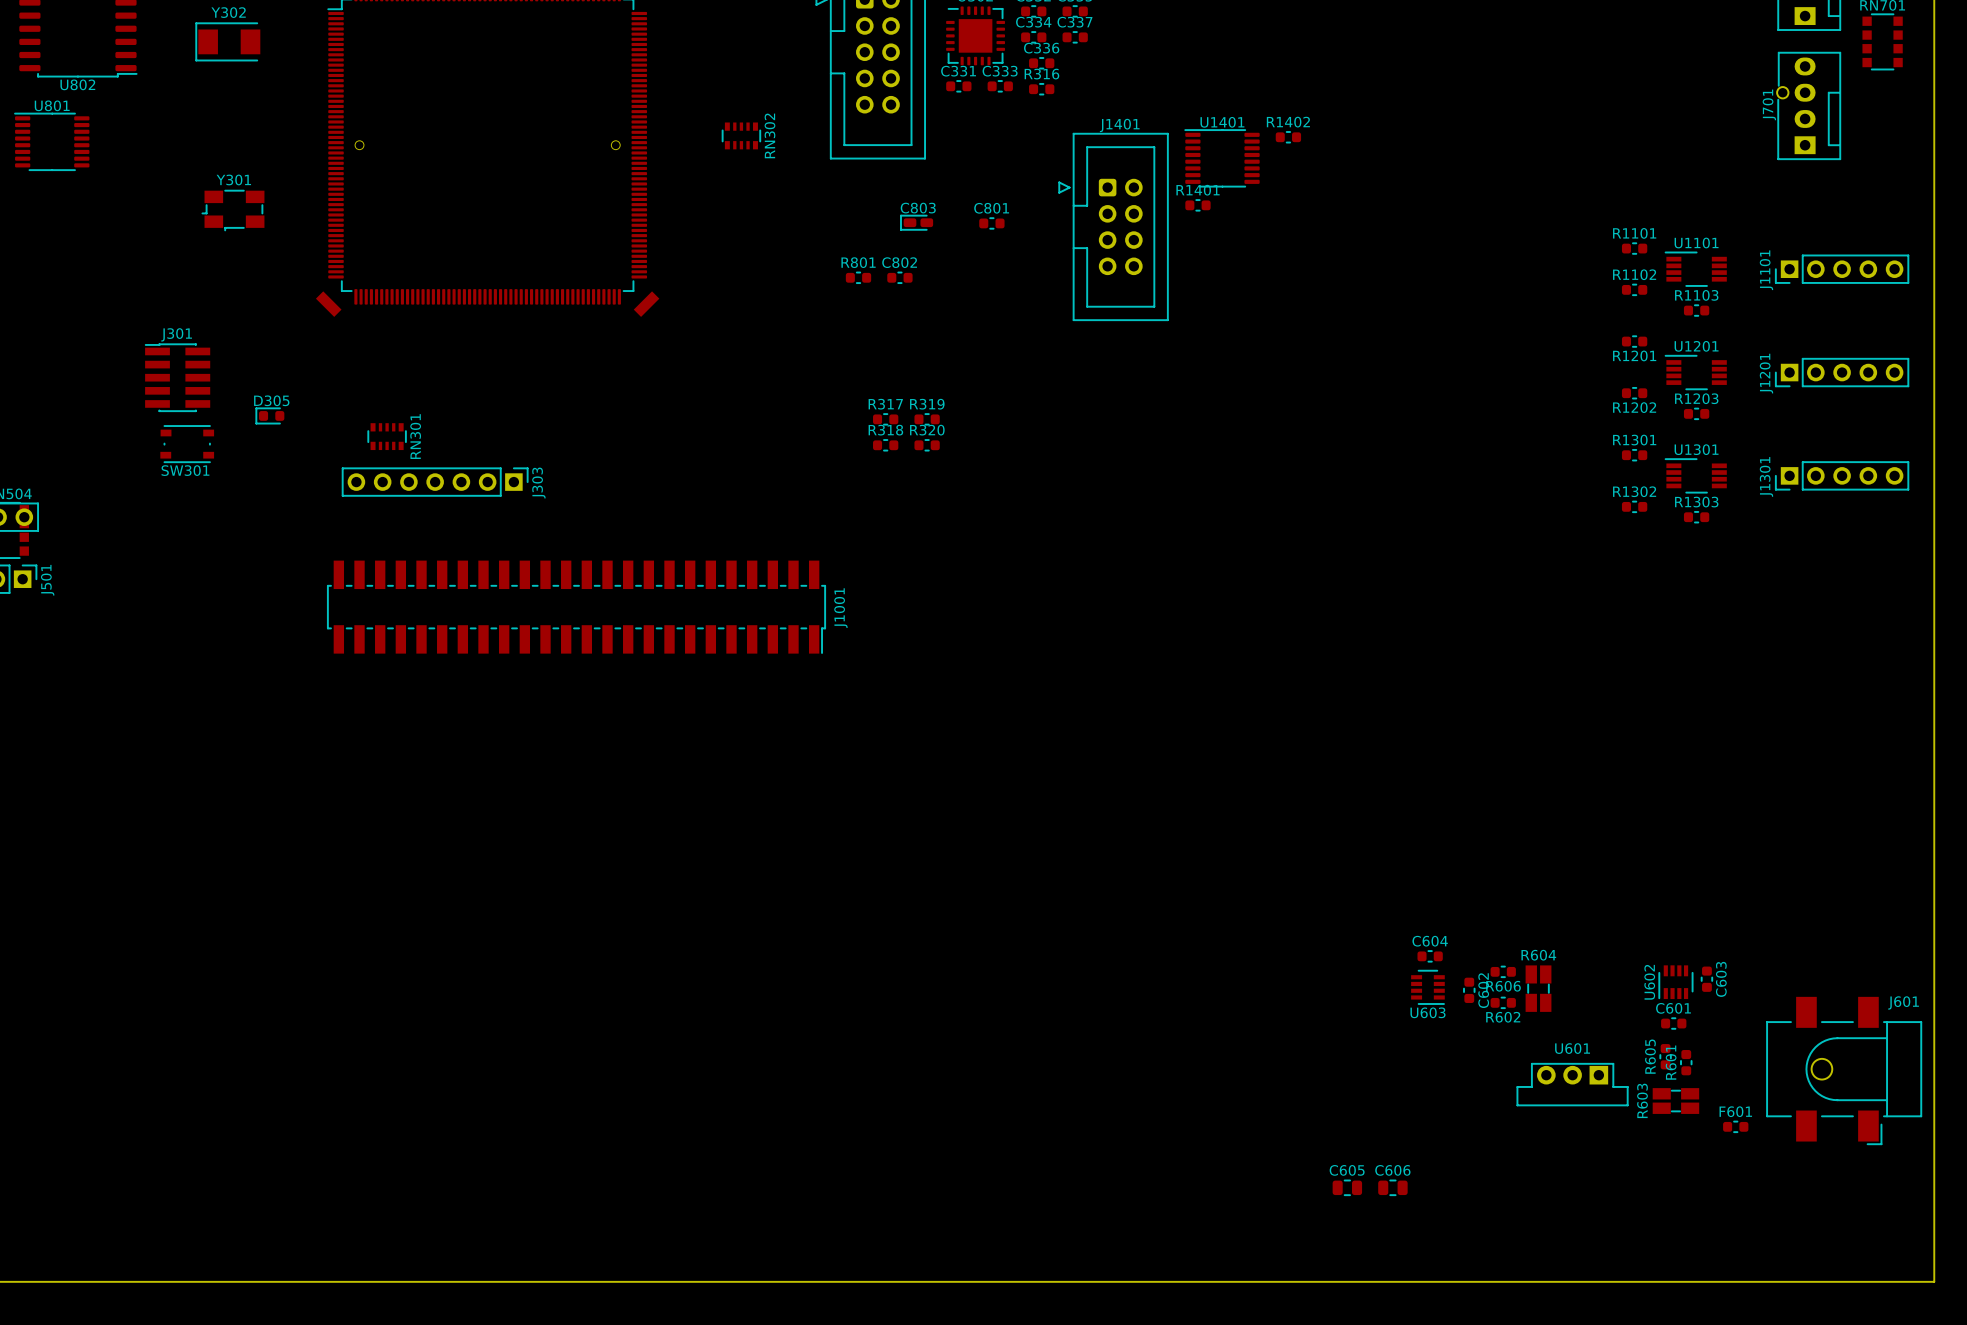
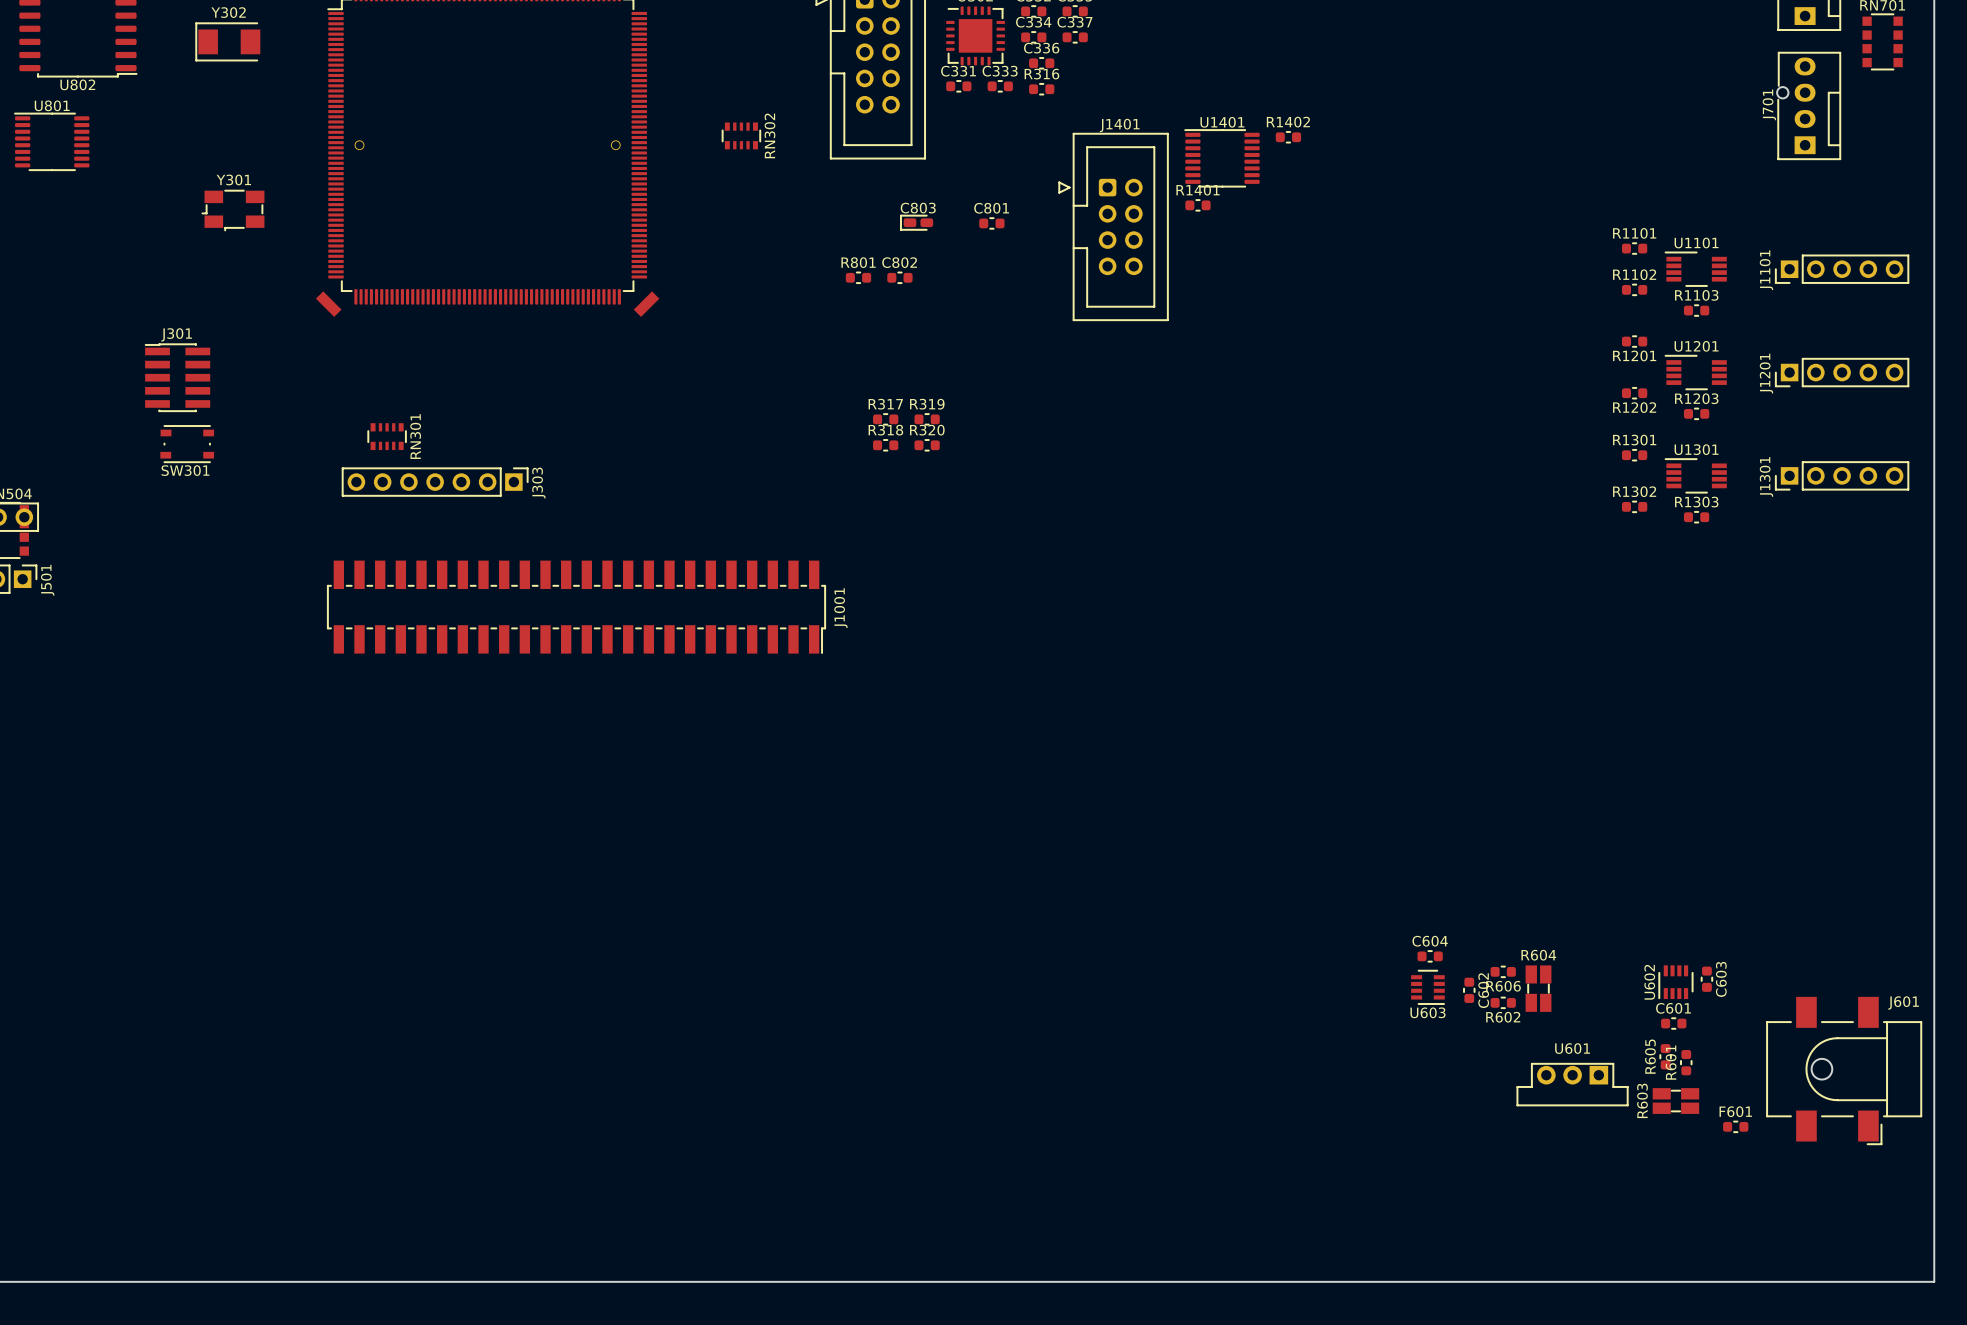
D305: (270, 415) -> none
C605: (1347, 1187) -> none
C606: (1392, 1187) -> none

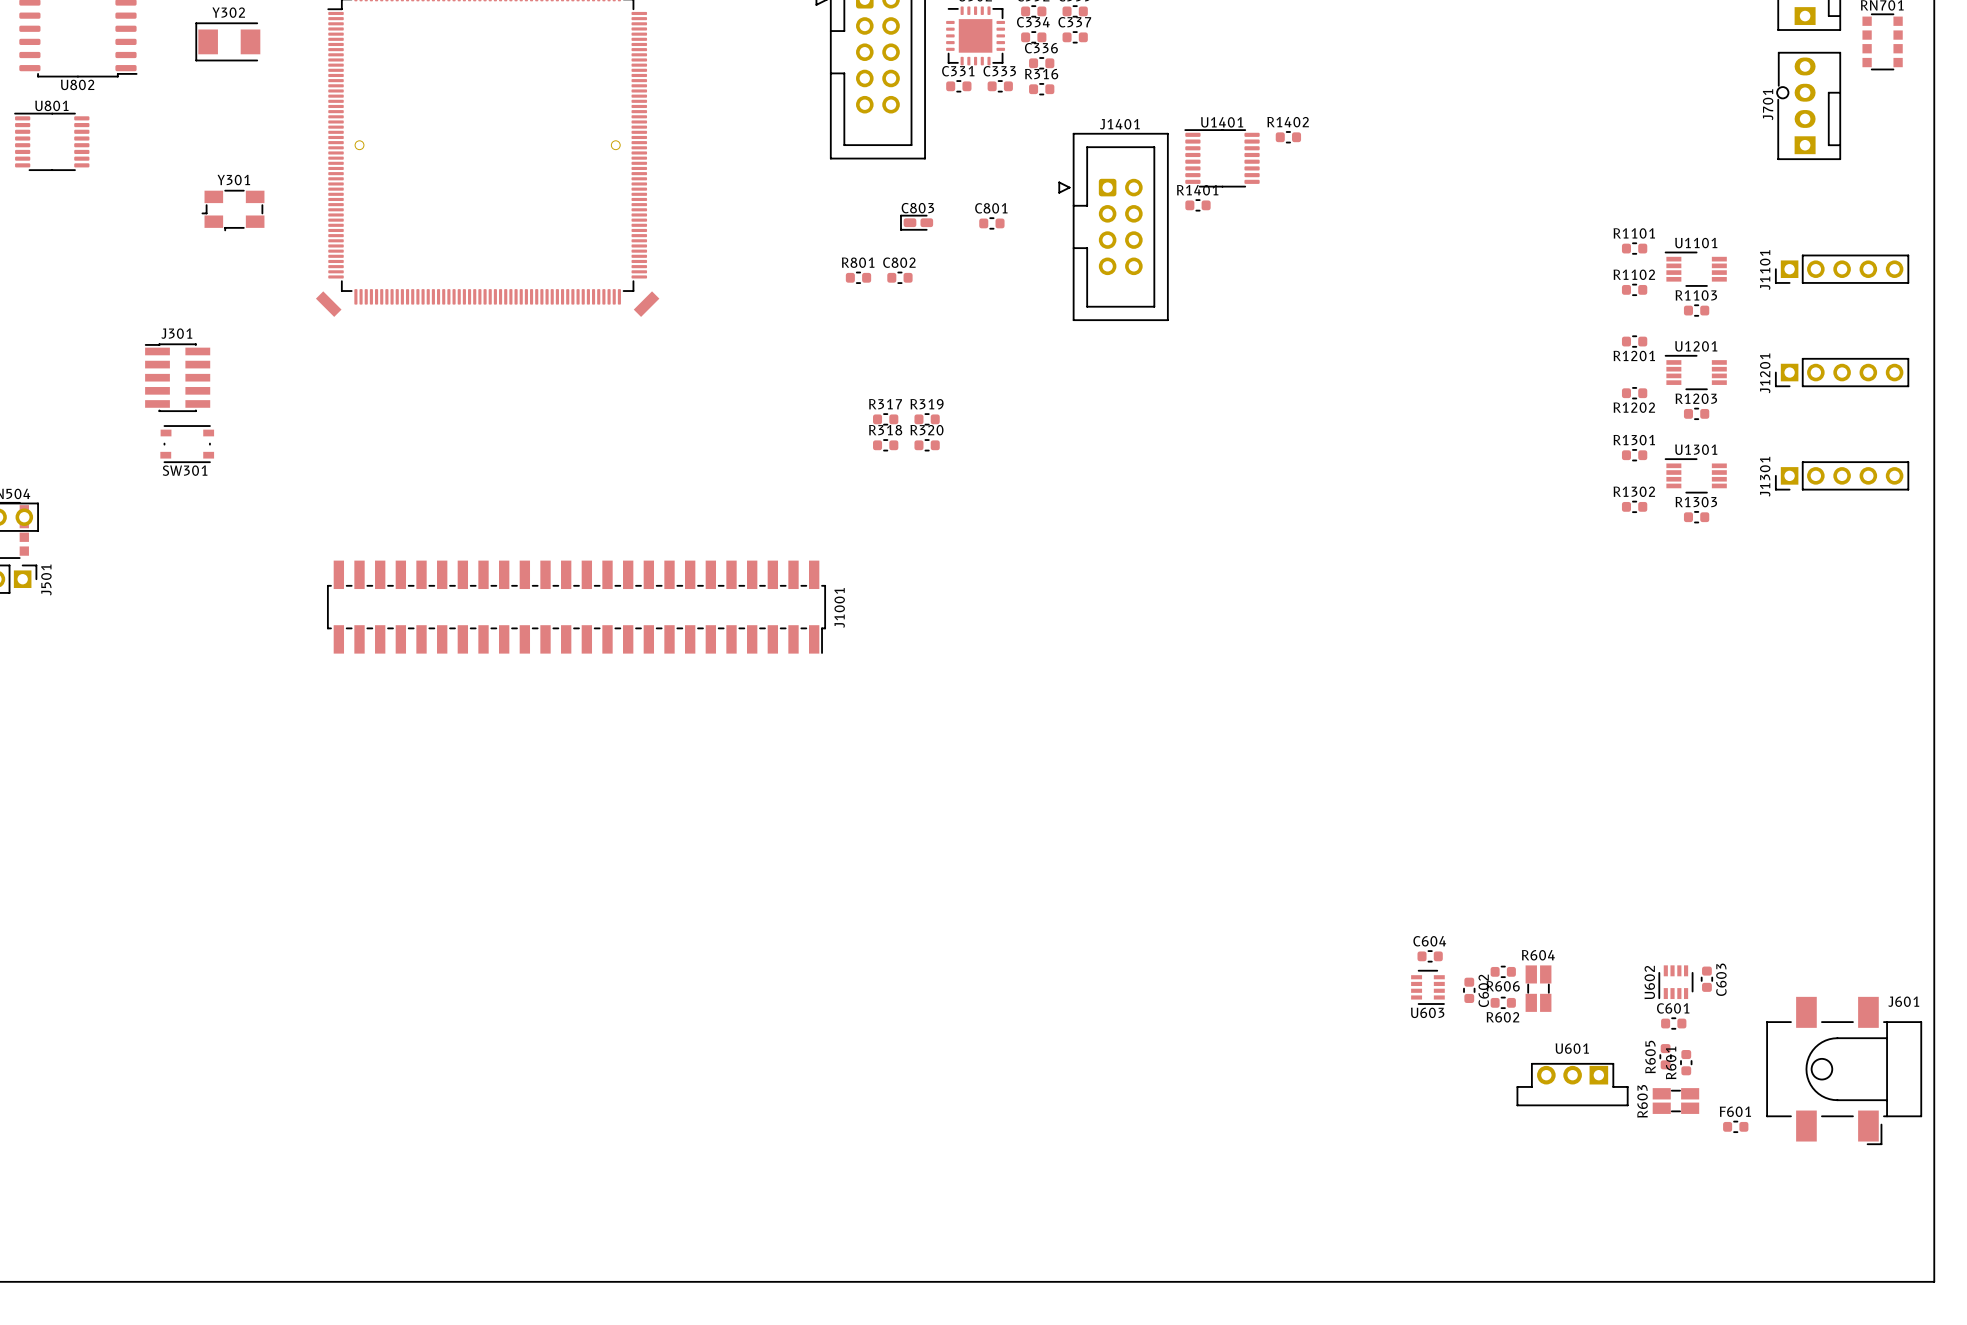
RN302: (741, 135) -> none
RN301: (387, 436) -> none
J303: (435, 482) -> none

